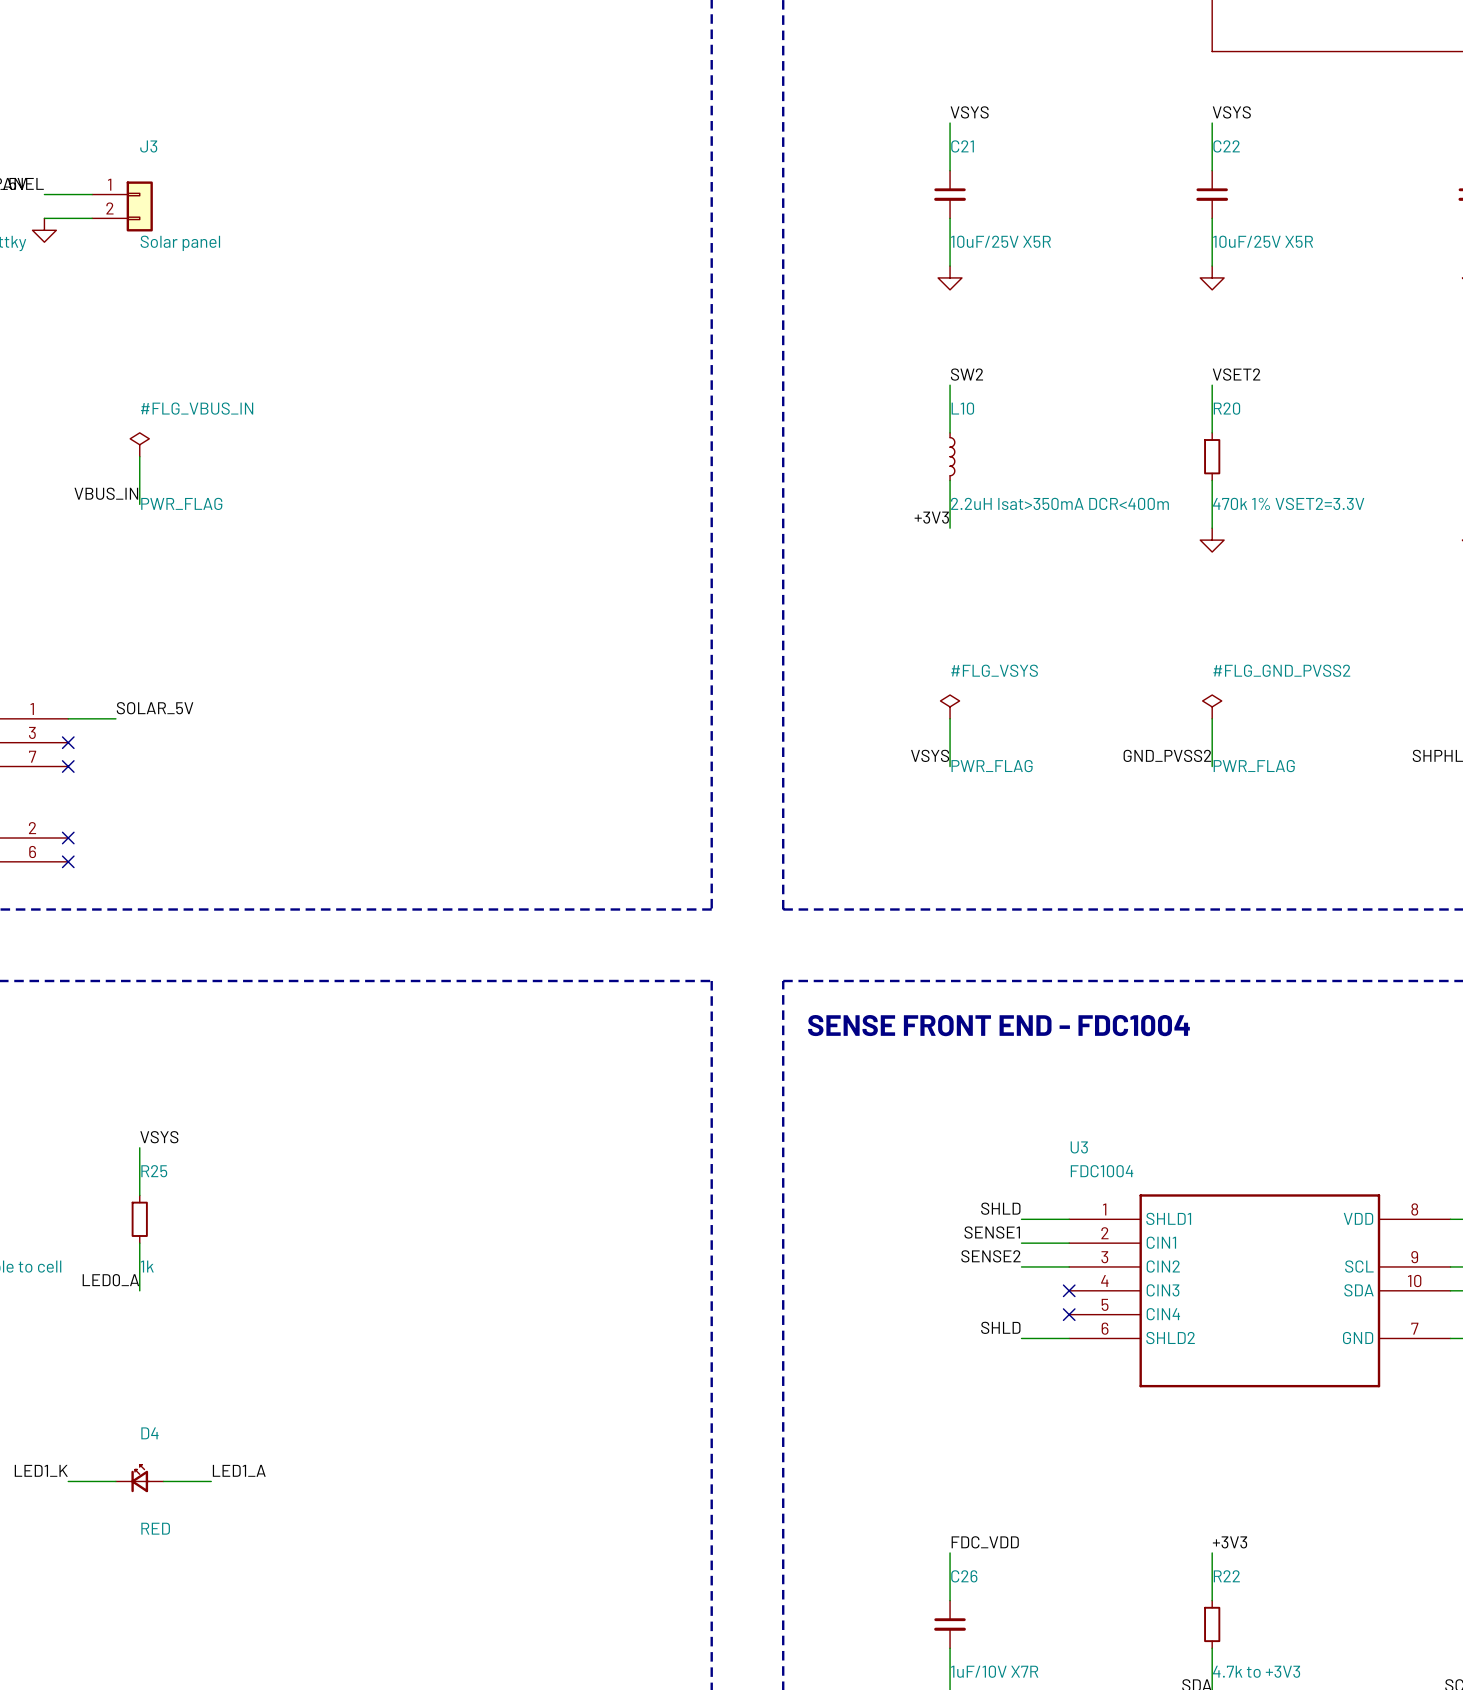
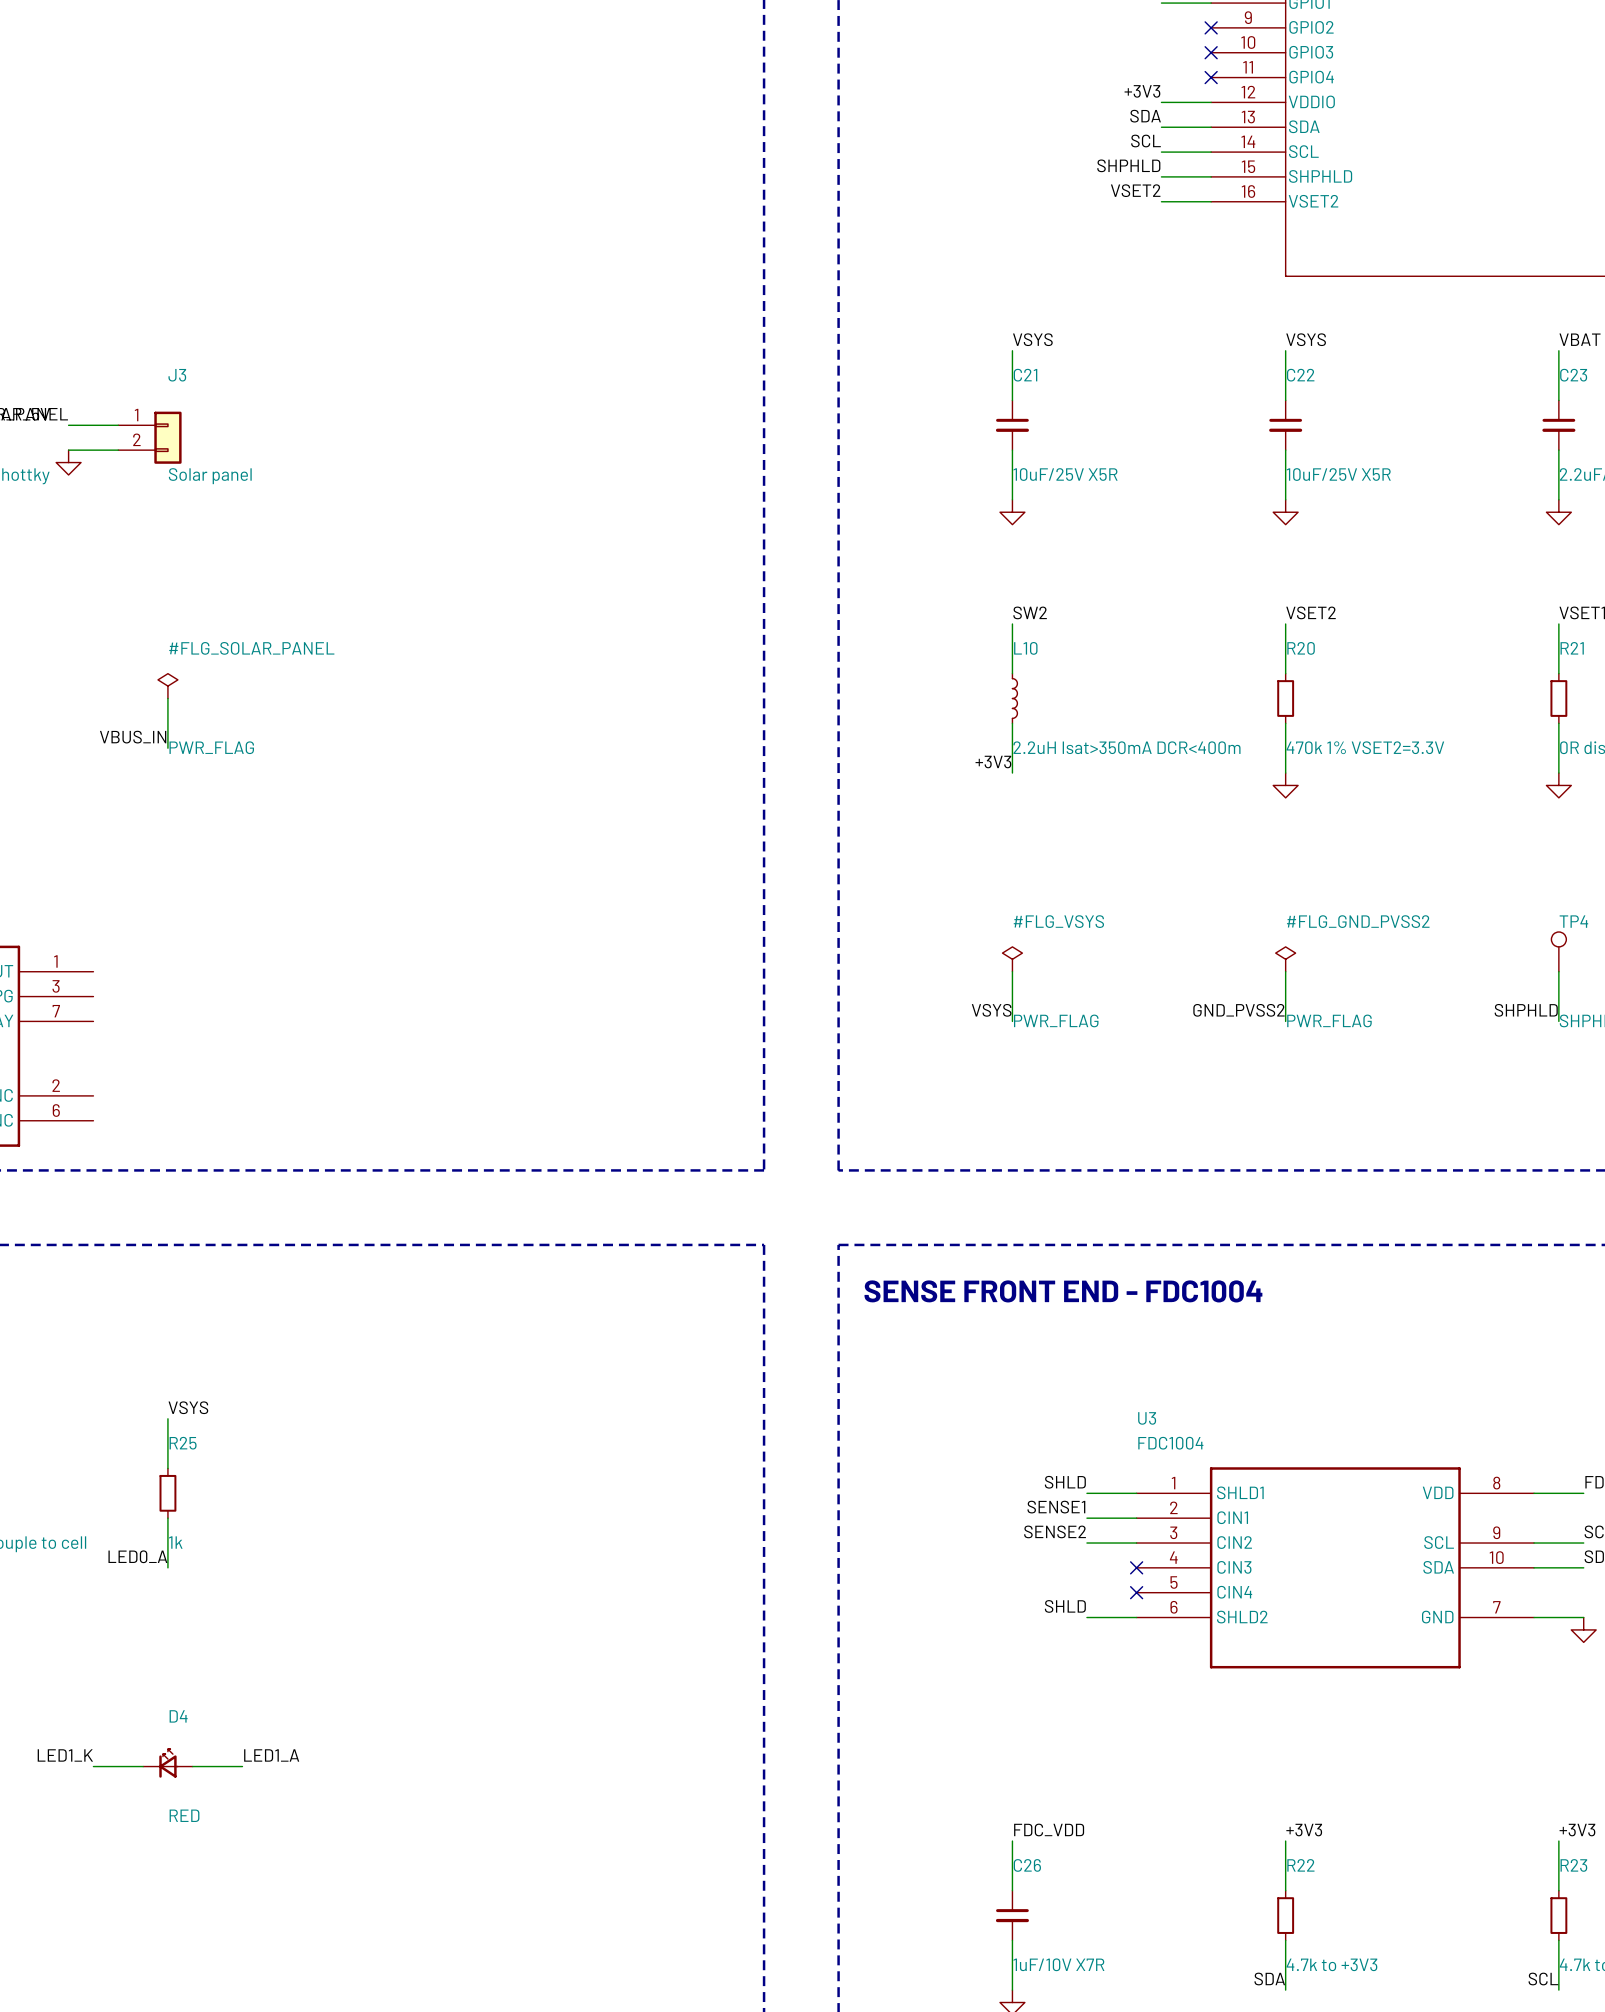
#FLG_VBUS_IN name: #FLG_VBUS_IN (197, 408) -> #FLG_SOLAR_PANEL (251, 648)
label: SOLAR_5V (155, 708) -> none
wire: (68, 718) (115, 718) -> none
no-connect mark: (68, 742) -> none
no-connect mark: (68, 766) -> none
no-connect mark: (68, 838) -> none
no-connect mark: (68, 861) -> none

